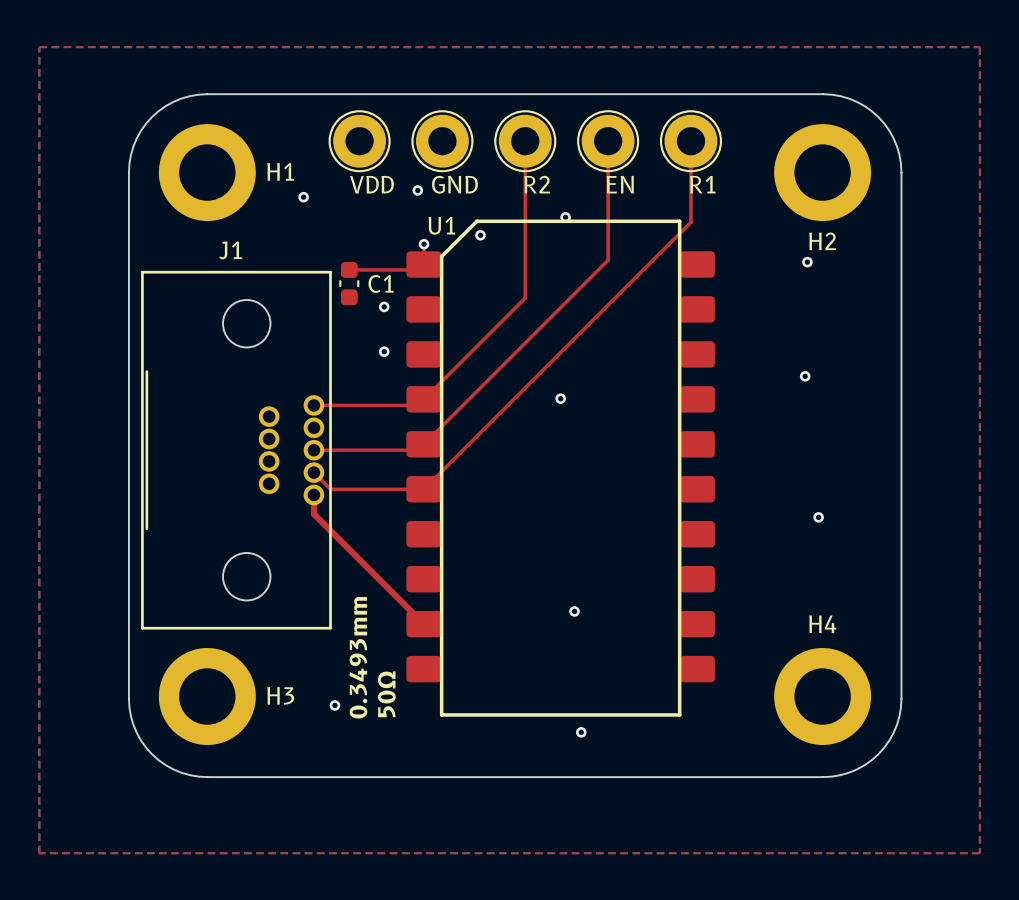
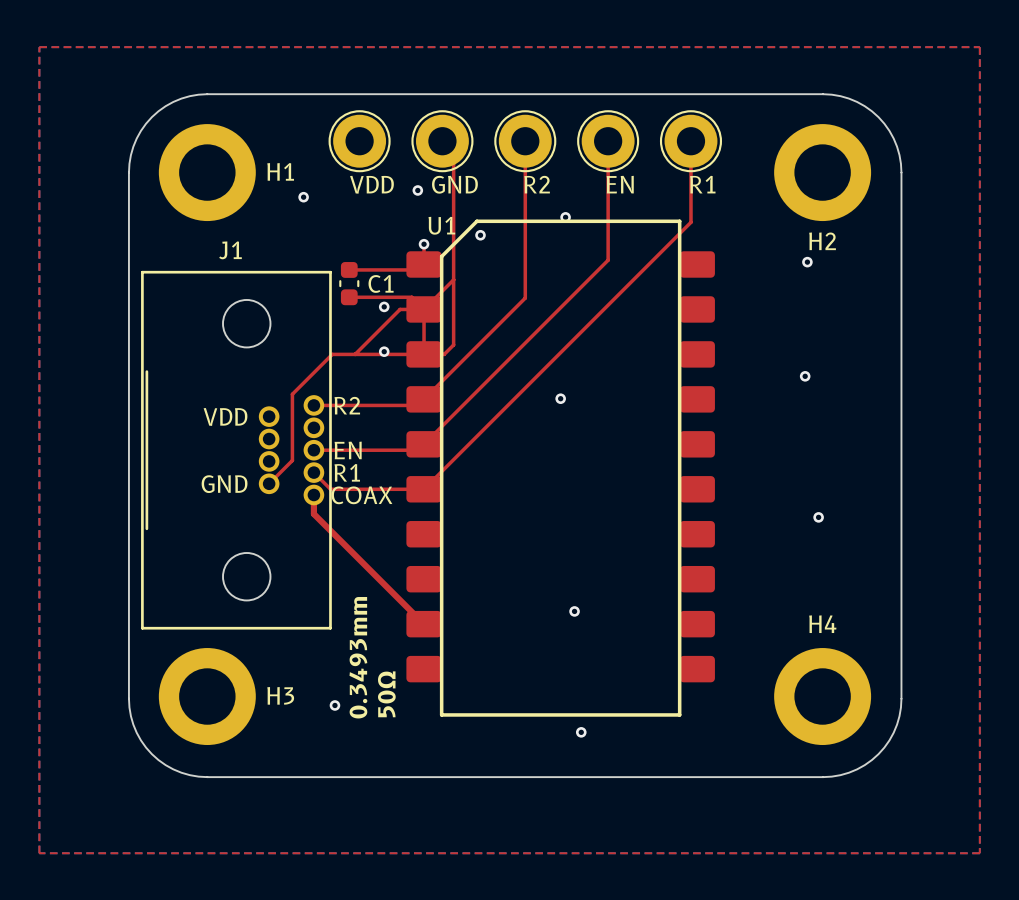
top track: none -> (442, 141) (453, 152) (453, 344) (444, 354) (332, 354) (292, 394) (292, 460) (269, 483)
top track: none -> (453, 279) (424, 309)
top track: none -> (349, 297) (411, 297) (424, 309)
top track: none -> (424, 309) (424, 354)
top track: none -> (424, 309) (400, 309) (355, 354)
text: none -> R2 (347, 405)
text: none -> VDD (225, 416)
text: none -> EN (348, 450)
text: none -> R1 (347, 472)
text: none -> GND (224, 484)
text: none -> COAX (361, 495)

